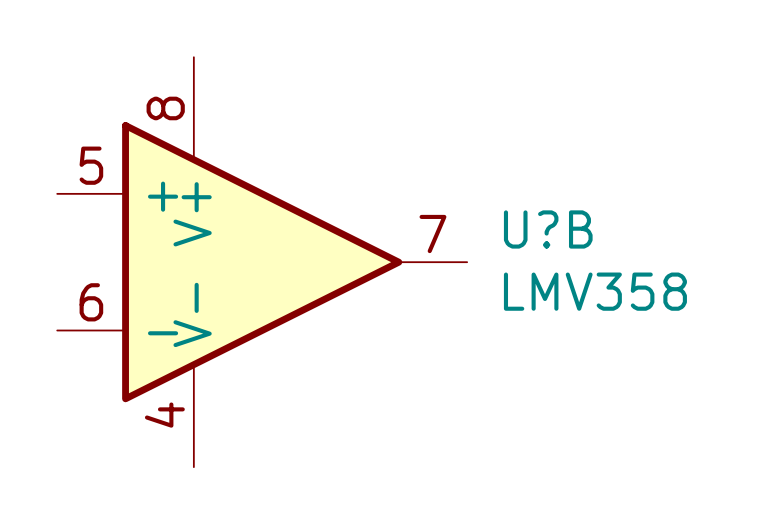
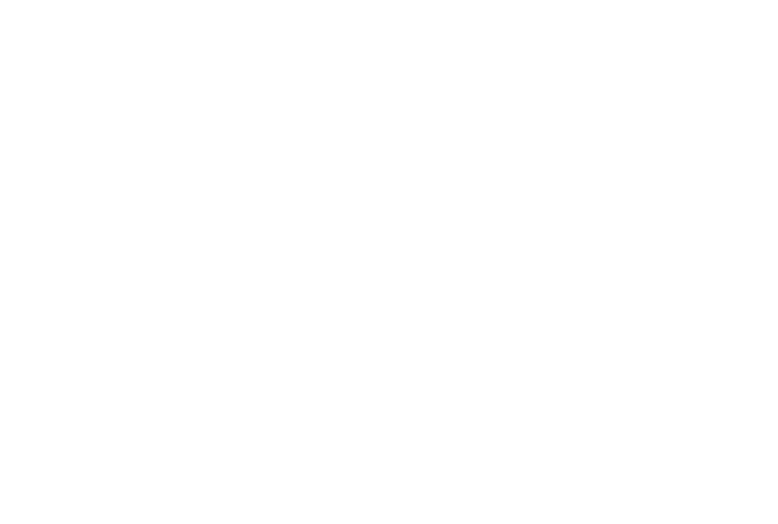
U?B: LMV358 (262, 262) -> none

